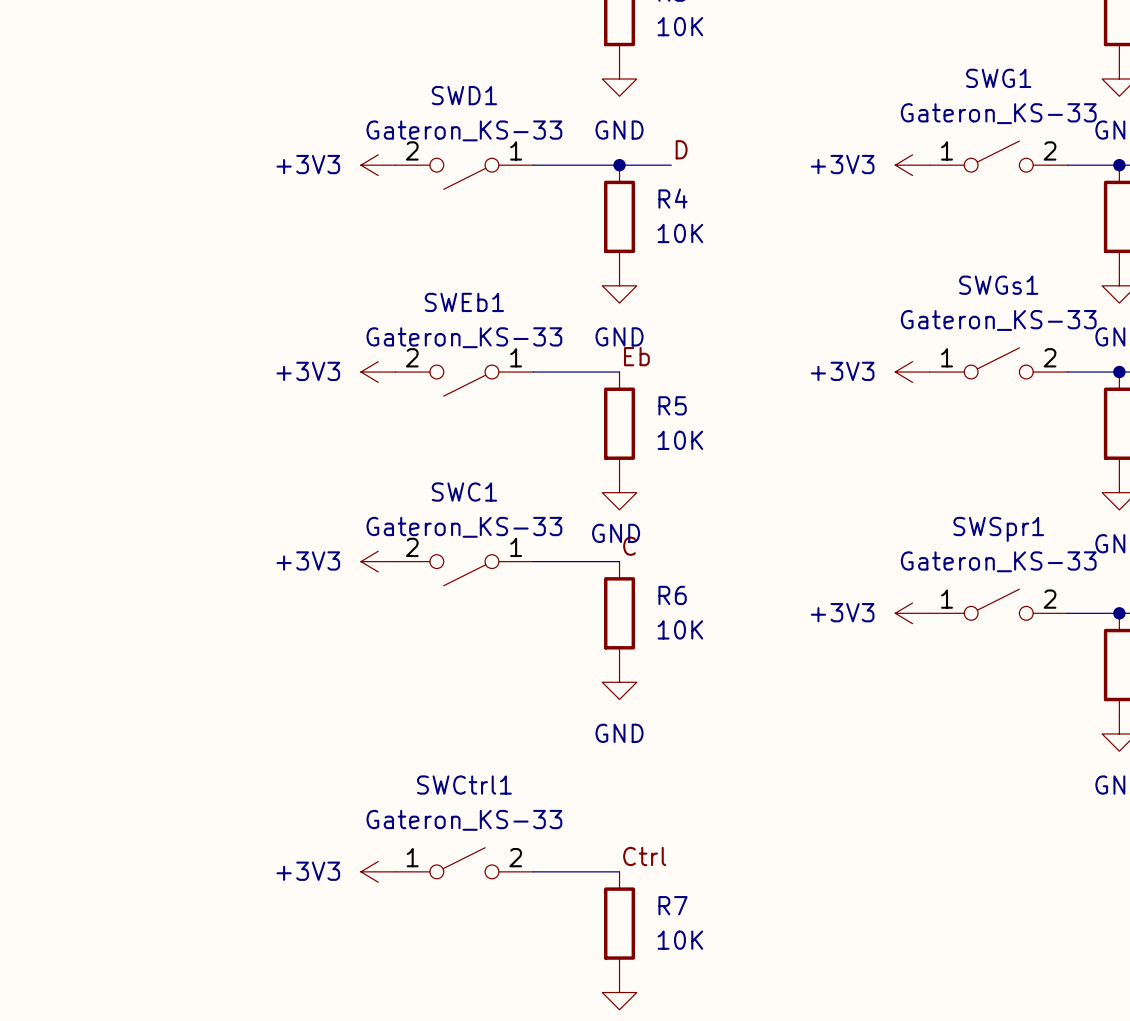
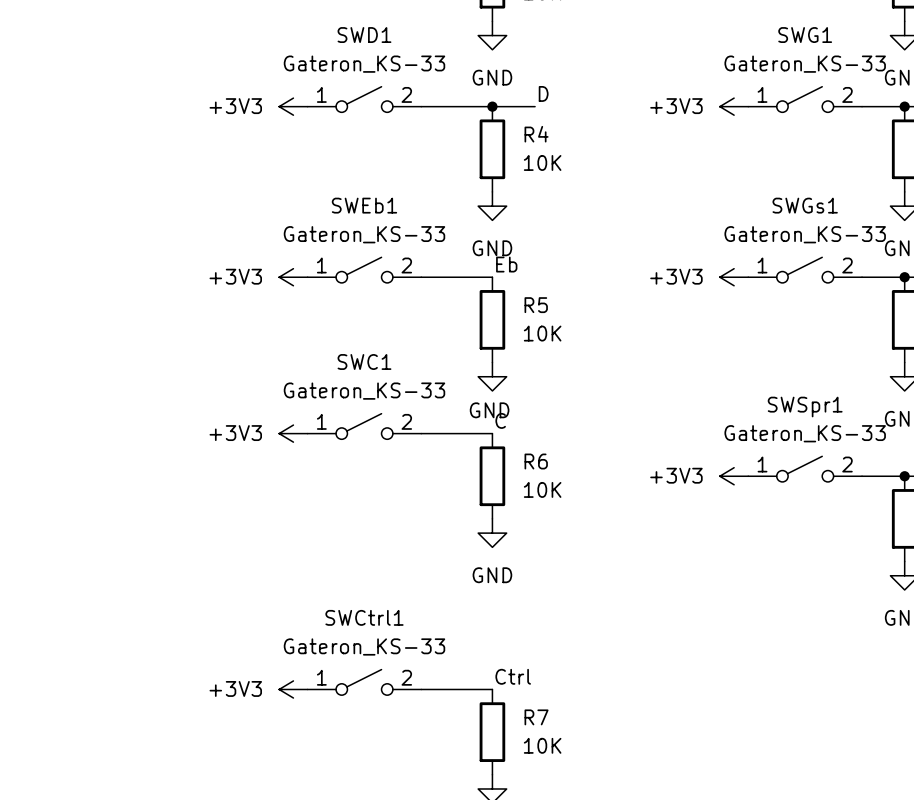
SWD1 rotation: 0° (464, 173) -> 180° (364, 99)
SWEb1 rotation: 0° (464, 380) -> 180° (364, 270)
SWC1 rotation: 0° (464, 570) -> 180° (364, 426)

